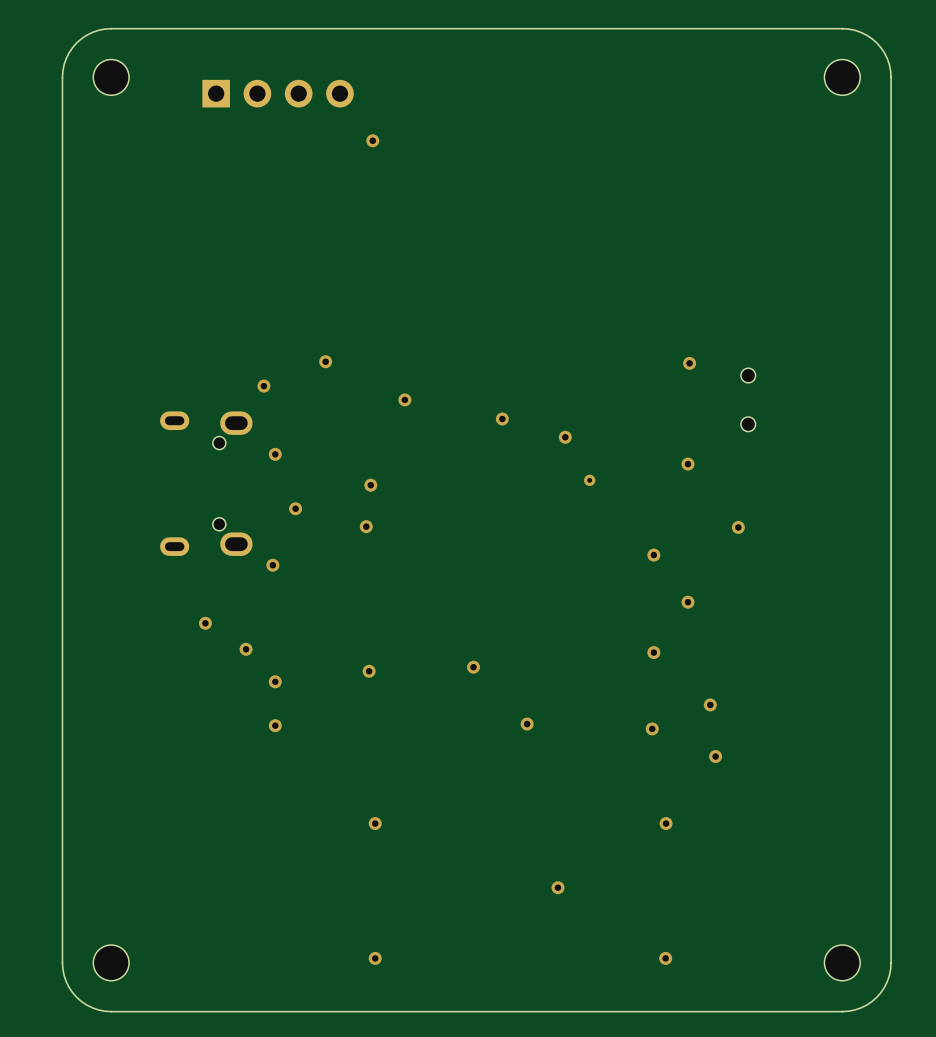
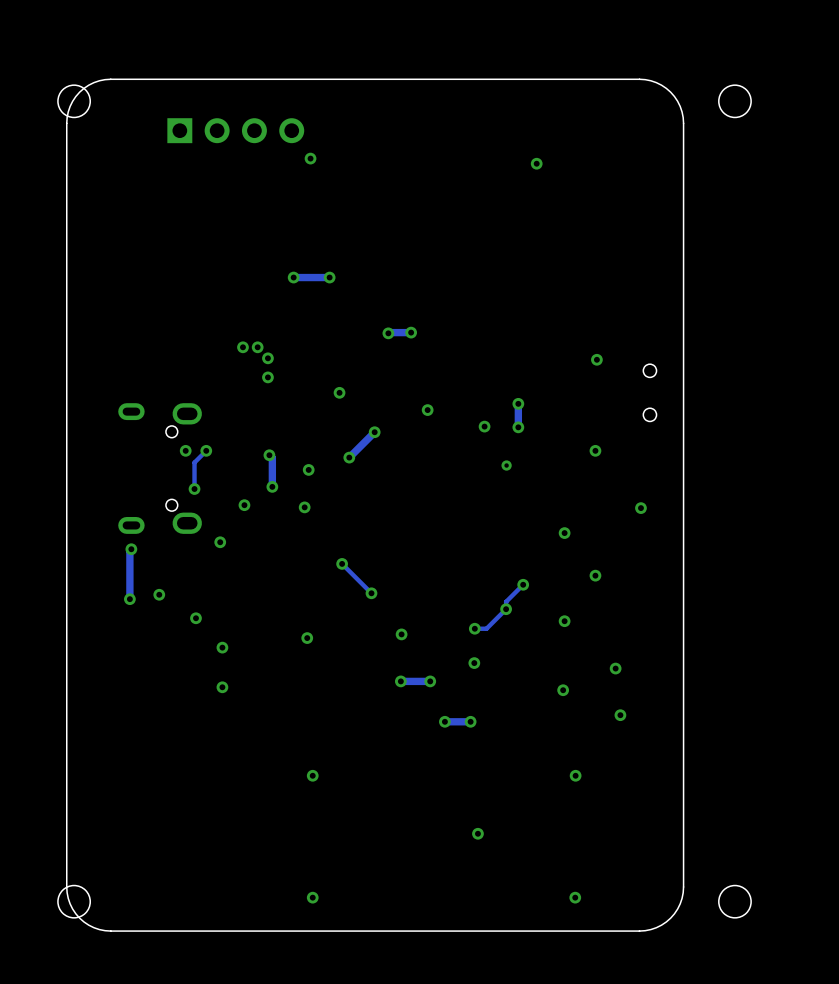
board edge: (842, 28) (111, 28) (92, 32) (81, 38) (72, 47) (66, 58) (62, 77) (62, 962) (66, 981) (72, 992) (81, 1001) (98, 1009) (111, 1011) (842, 1011) (860, 1007) (872, 1001) (881, 992) (889, 975) (891, 962) (891, 77) (887, 58) (876, 42) (860, 32) (842, 28) -> (639, 79) (656, 82) (670, 92) (680, 106) (683, 123) (683, 887) (682, 898) (677, 909) (670, 918) (661, 925) (650, 929) (639, 931) (110, 931) (99, 929) (88, 925) (79, 918) (72, 909) (68, 898) (66, 887) (66, 123) (68, 111) (72, 101) (79, 92) (88, 85) (99, 80) (110, 79) (639, 79)
part position: (278, 93) -> (235, 130)
via: none -> (536, 163)
via: none -> (293, 277)
track: none -> (329, 277) (293, 277)
via: none -> (329, 277)
track: none -> (411, 332) (388, 333)
via: none -> (411, 332)
via: none -> (388, 333)
via: none -> (242, 347)
via: none -> (257, 347)
via: none -> (267, 377)
via: (263, 386) -> none
track: none -> (518, 403) (518, 427)
via: none -> (518, 403)
via: none -> (518, 427)
track: none -> (374, 432) (349, 457)
via: none -> (374, 432)
via position: (275, 454) -> (206, 450)
via: none -> (185, 450)
track: none -> (206, 450) (194, 462) (194, 489)
track: none -> (269, 455) (272, 458) (272, 486)
via: none -> (269, 455)
via: none -> (349, 457)
via: none -> (272, 486)
via: none -> (194, 489)
via position: (295, 508) -> (244, 505)
track: none -> (131, 549) (129, 599)
via: none -> (131, 549)
track: none -> (342, 563) (371, 593)
via: none -> (342, 563)
track: none -> (523, 584) (506, 601) (506, 609) (486, 628) (474, 628)
via: none -> (523, 584)
via: none -> (371, 593)
via: none -> (129, 599)
via: none -> (506, 609)
via: none -> (474, 628)
via: none -> (474, 663)
via: none -> (400, 681)
track: none -> (430, 681) (400, 681)
via: none -> (430, 681)
via: (527, 724) -> none
via: none -> (444, 721)
track: none -> (470, 721) (444, 721)
via: none -> (470, 721)

